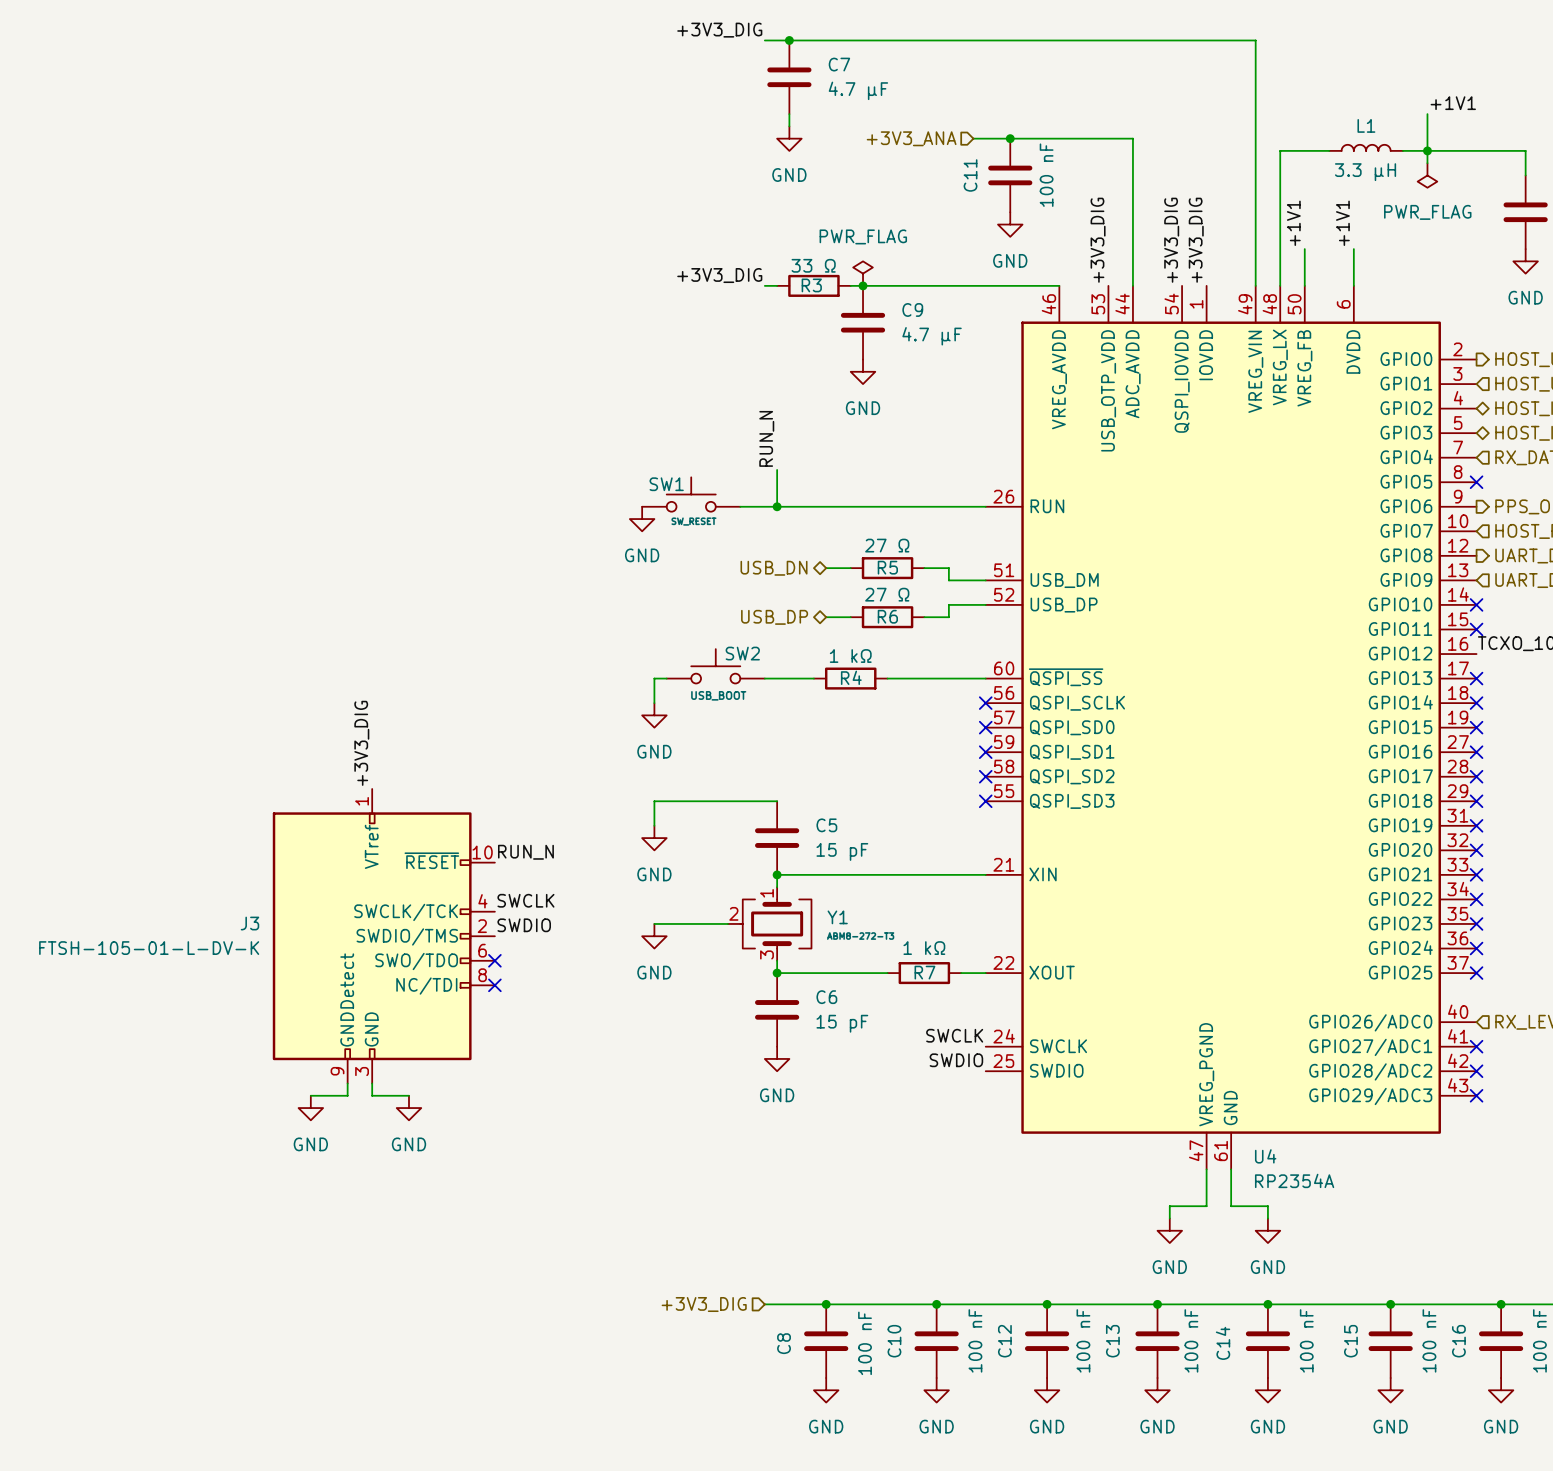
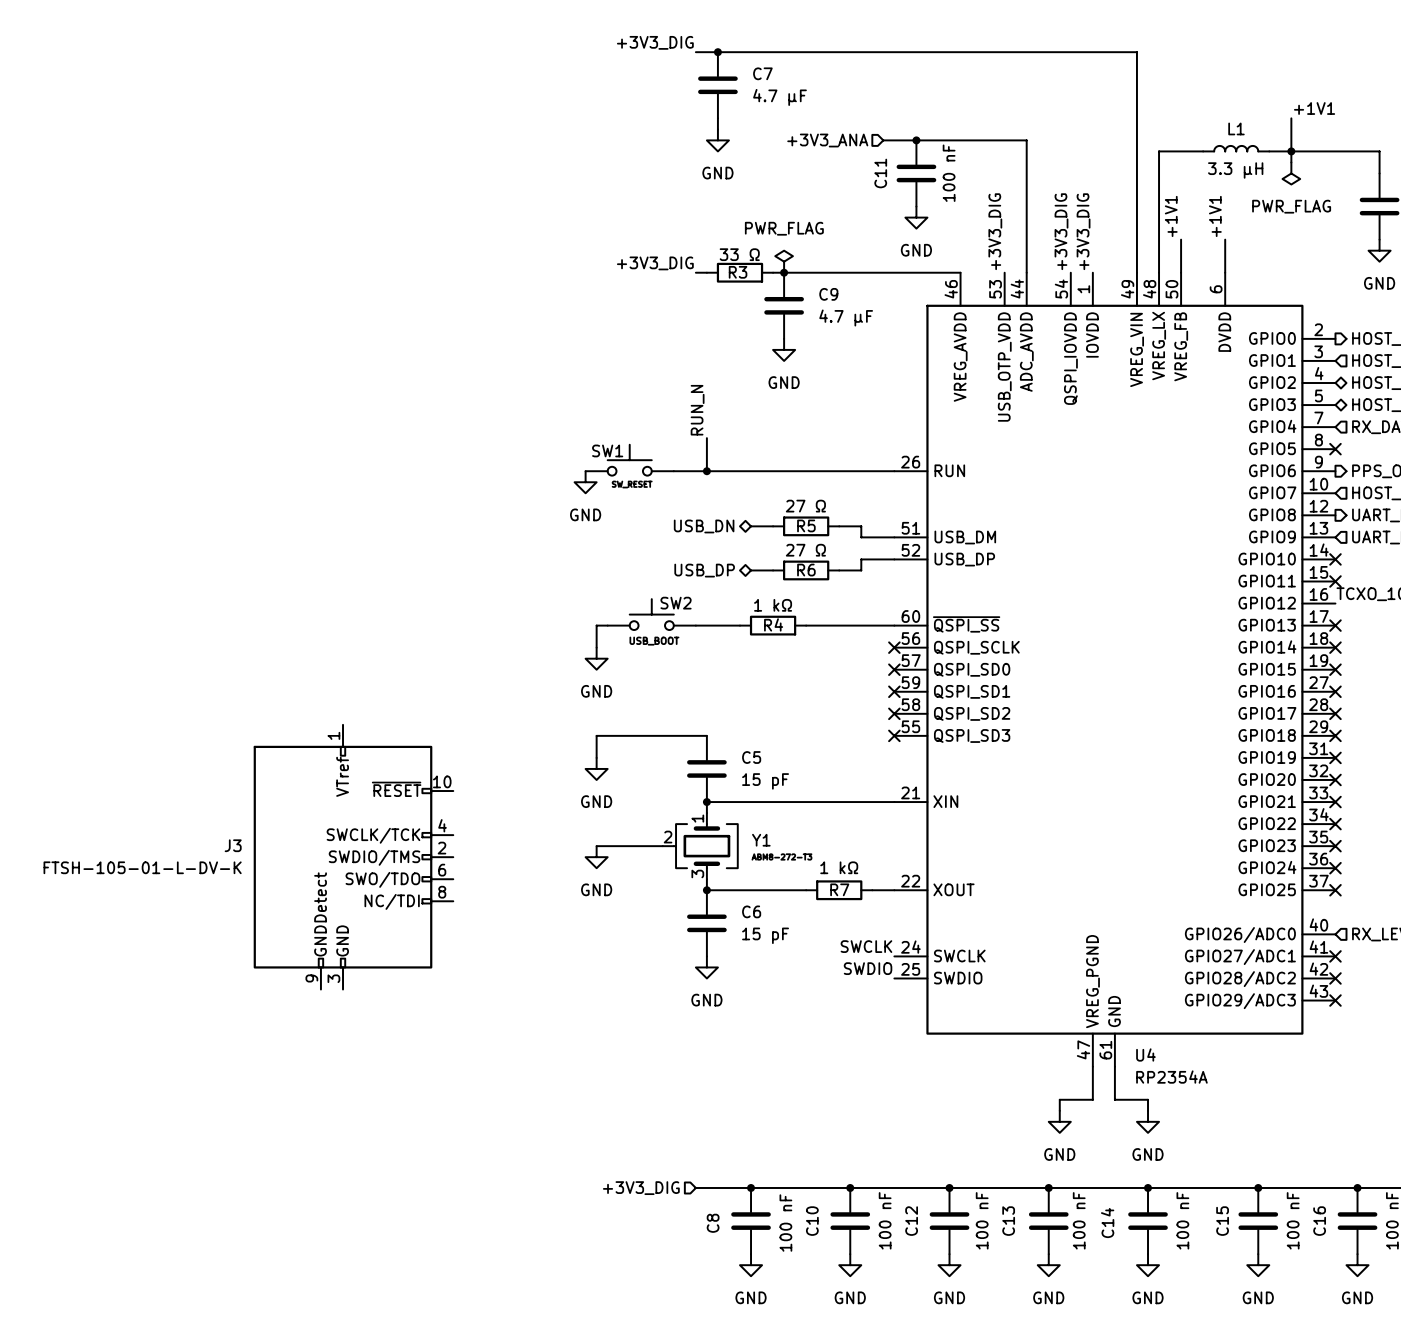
label: +3V3_DIG (361, 743) -> none
label: RUN_N (525, 852) -> none
label: SWCLK (525, 900) -> none
label: SWDIO (524, 925) -> none
no-connect mark: (494, 960) -> none
no-connect mark: (494, 985) -> none
wire: (347, 1083) (347, 1095) (310, 1095) -> none
wire: (372, 1083) (372, 1095) (408, 1095) -> none
power symbol: GND (310, 1108) -> none
power symbol: GND (408, 1108) -> none

